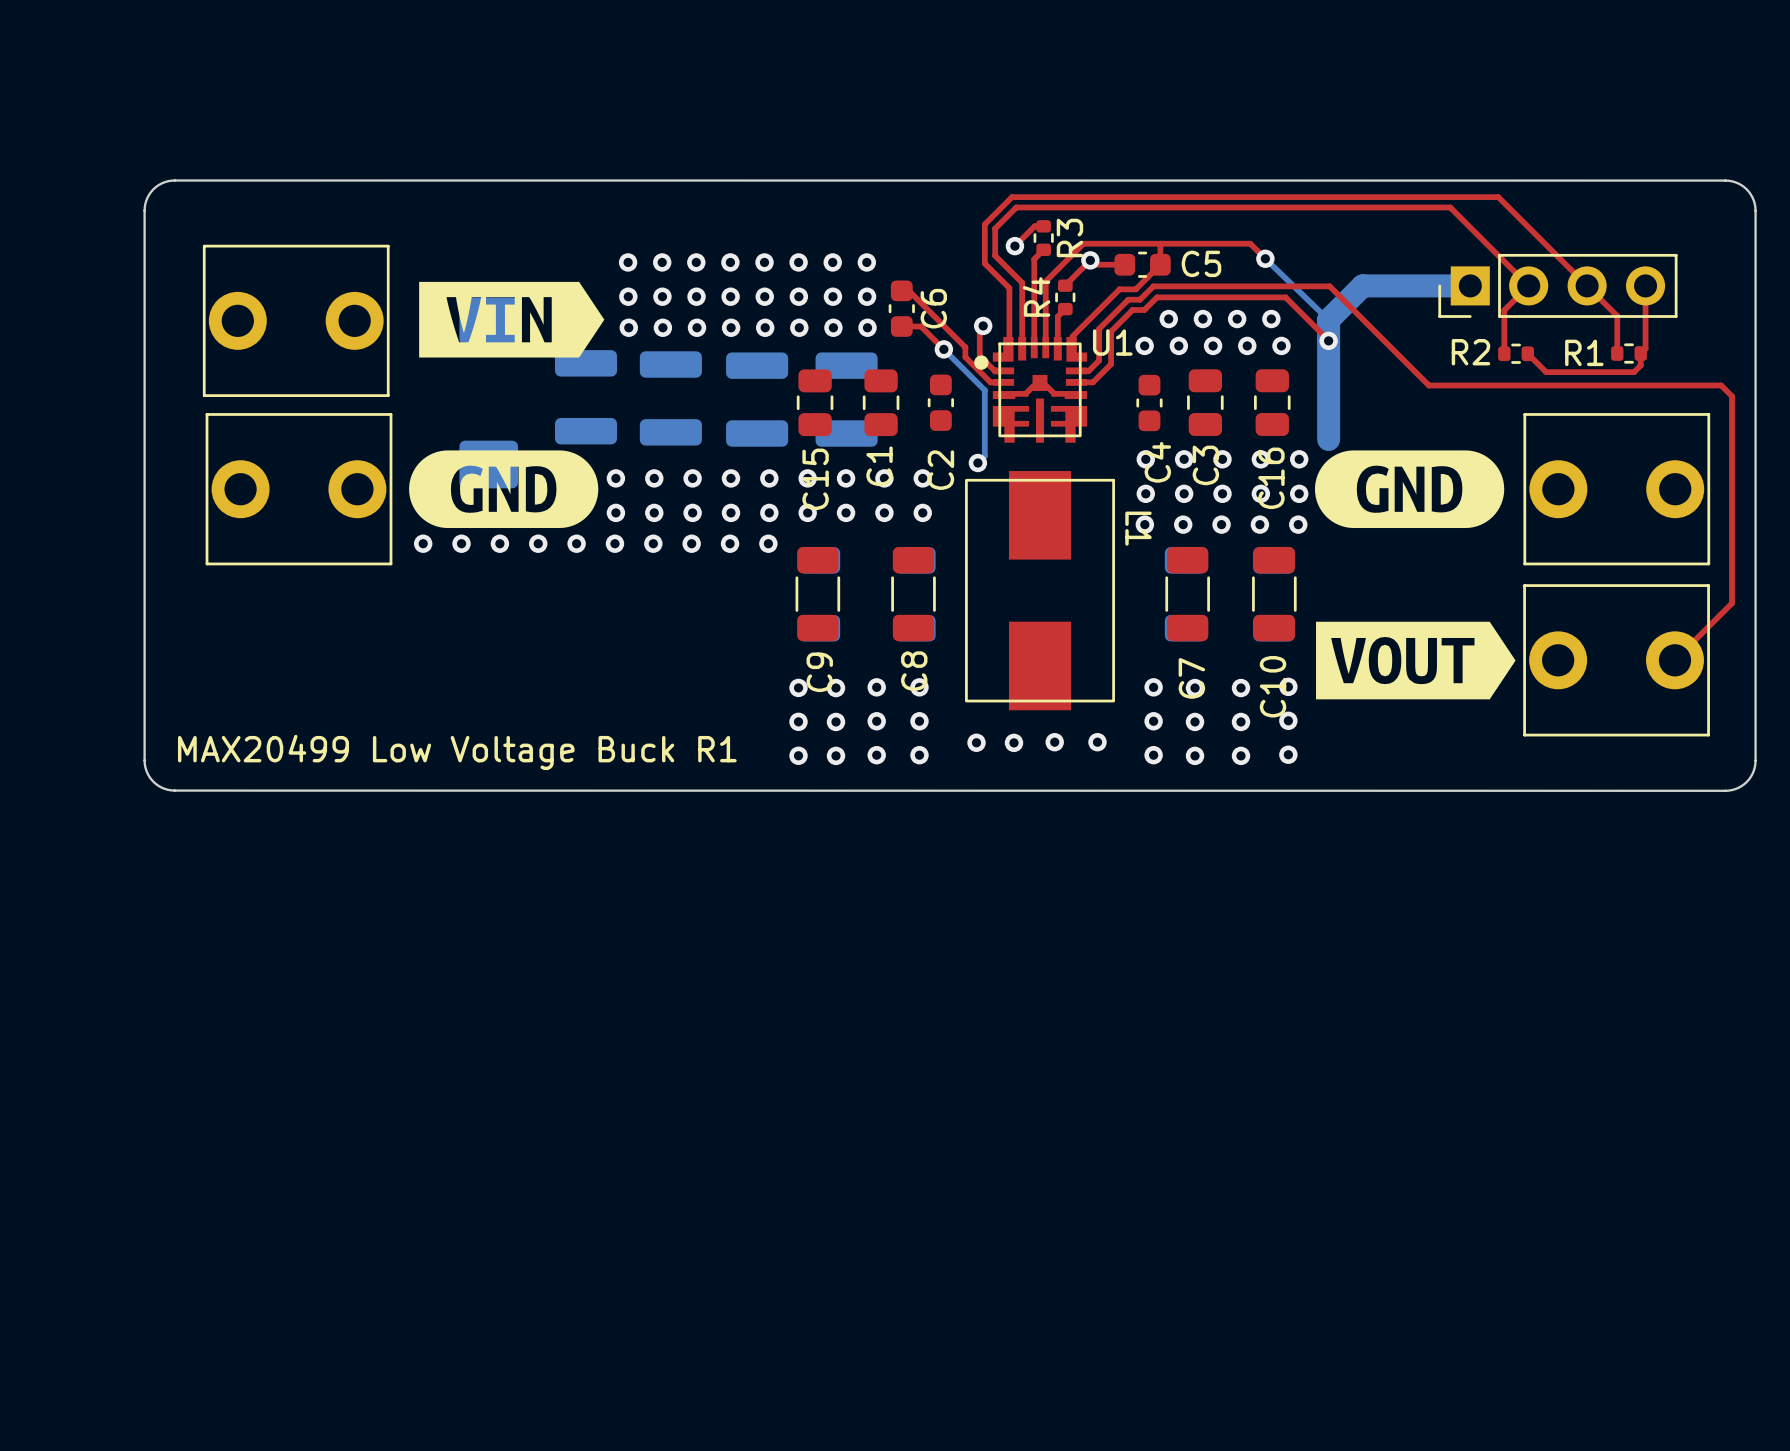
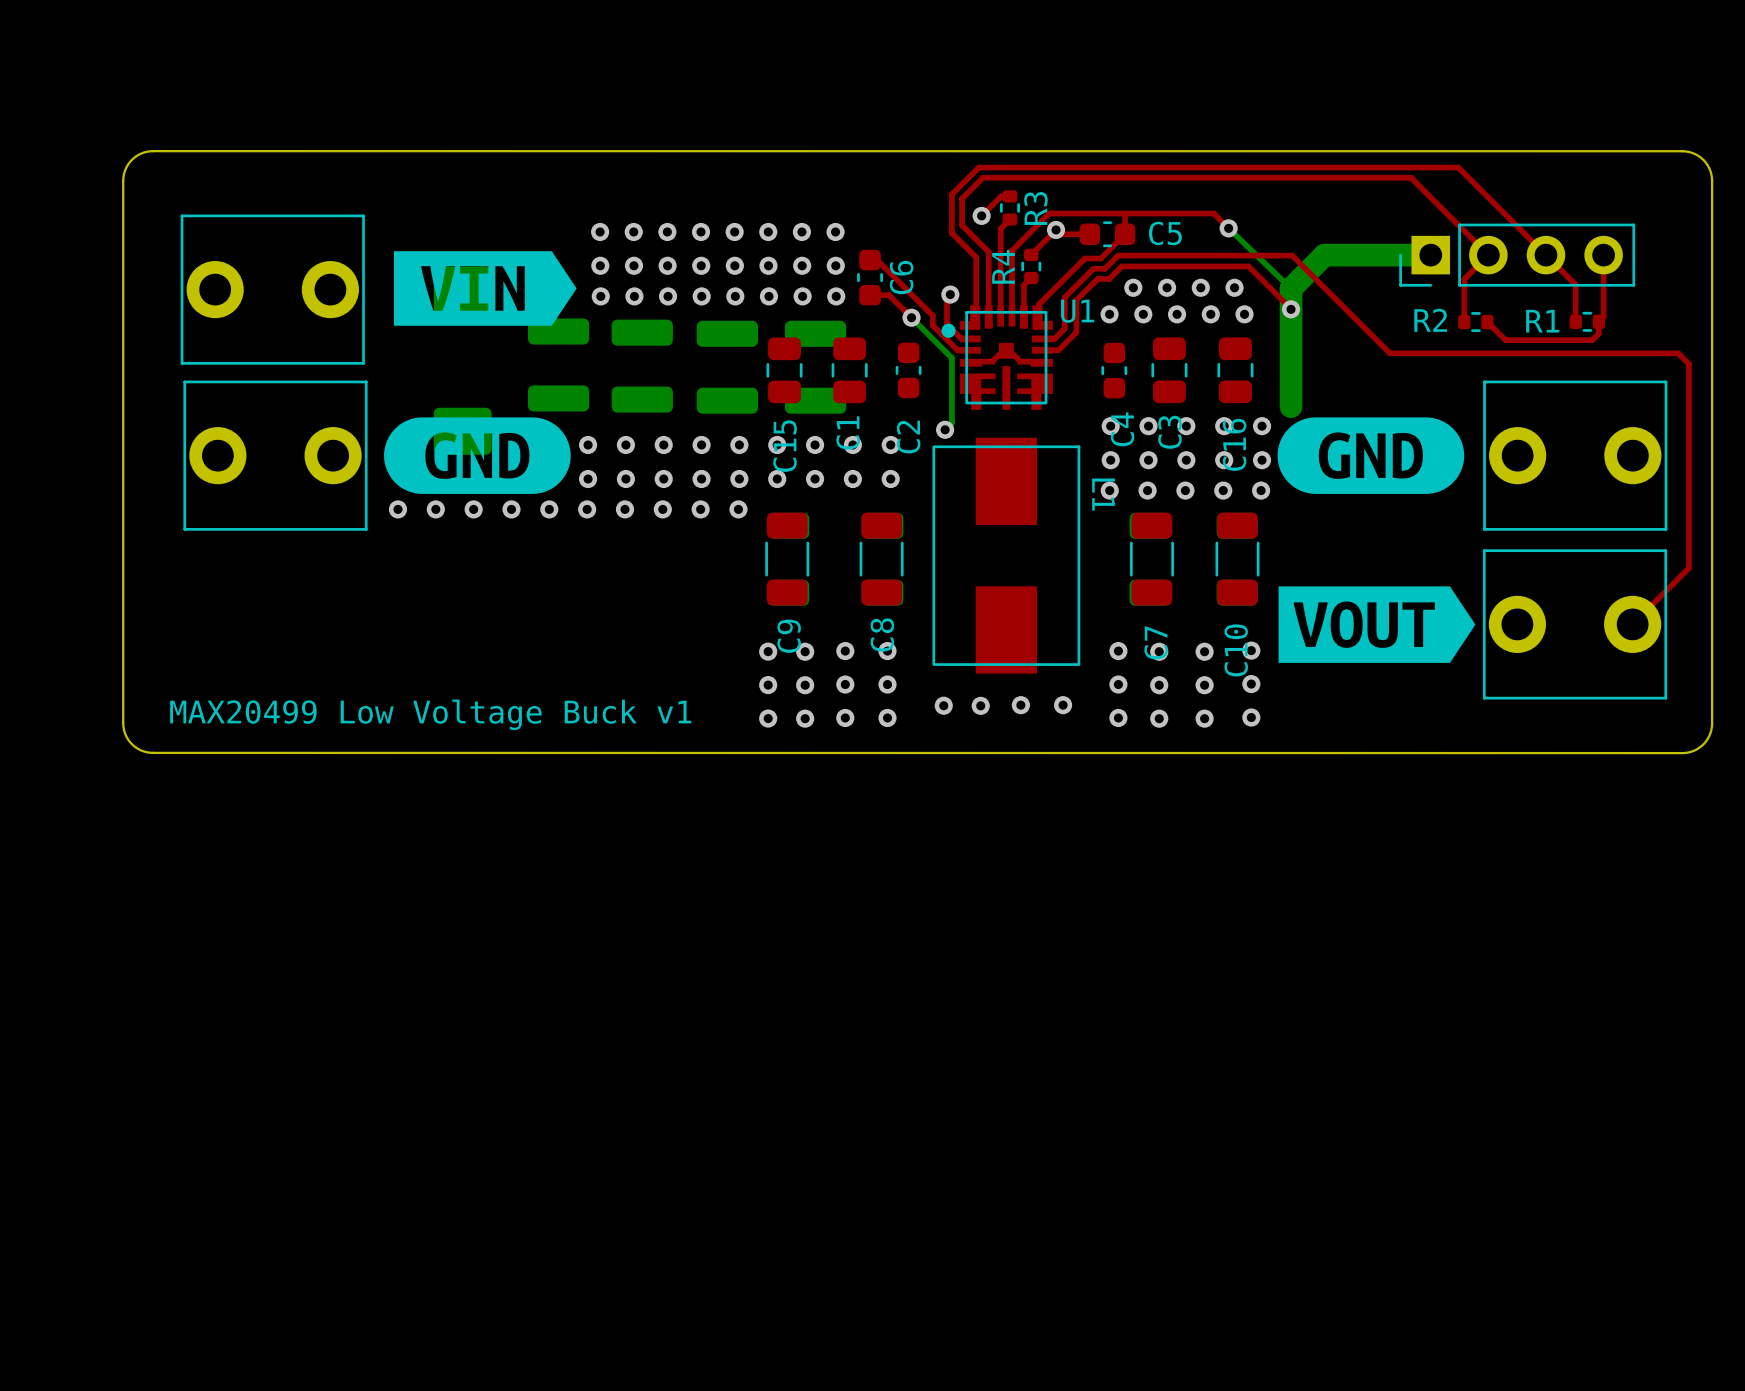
text: MAX20499 Low Voltage Buck R1 (457, 752) -> MAX20499 Low Voltage Buck v1 (430, 714)

